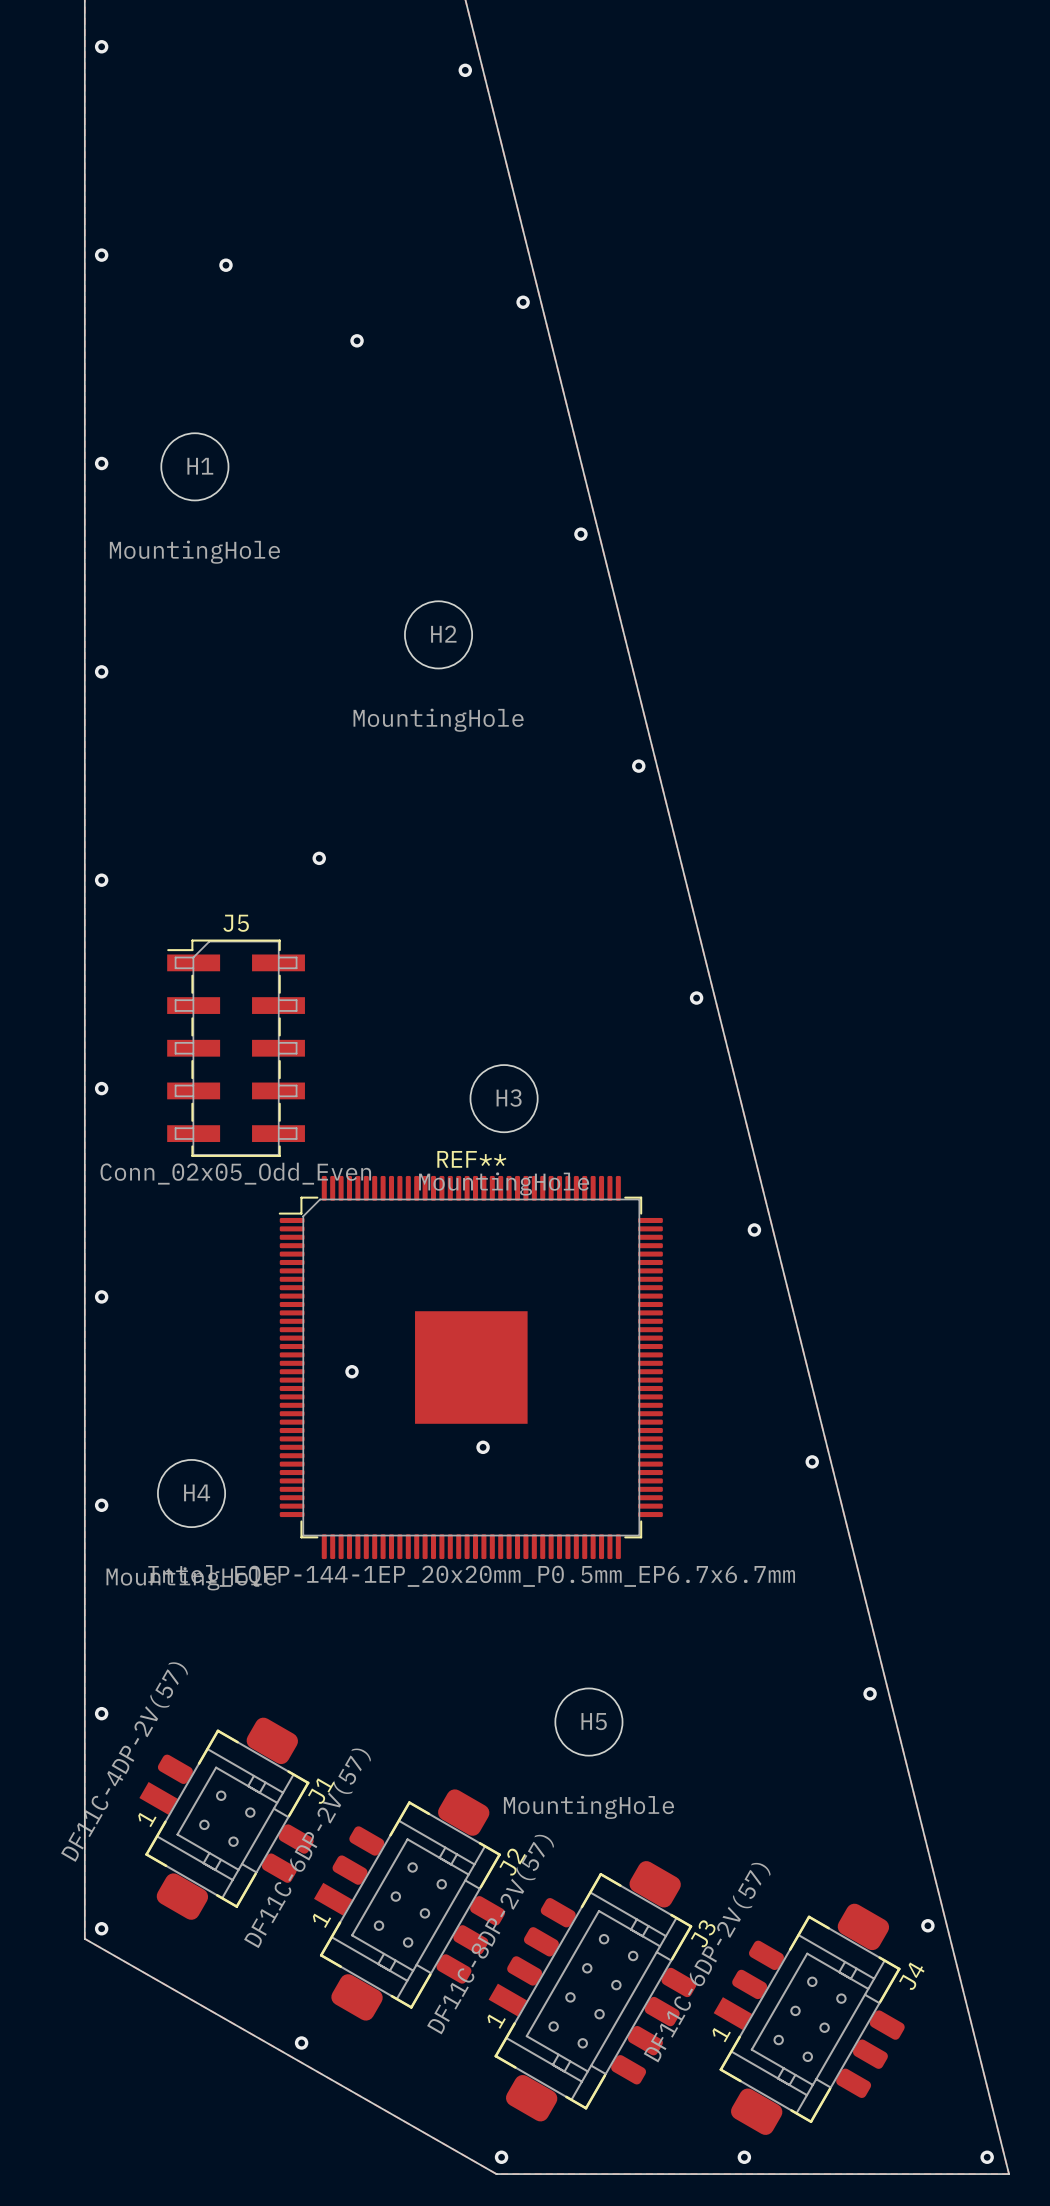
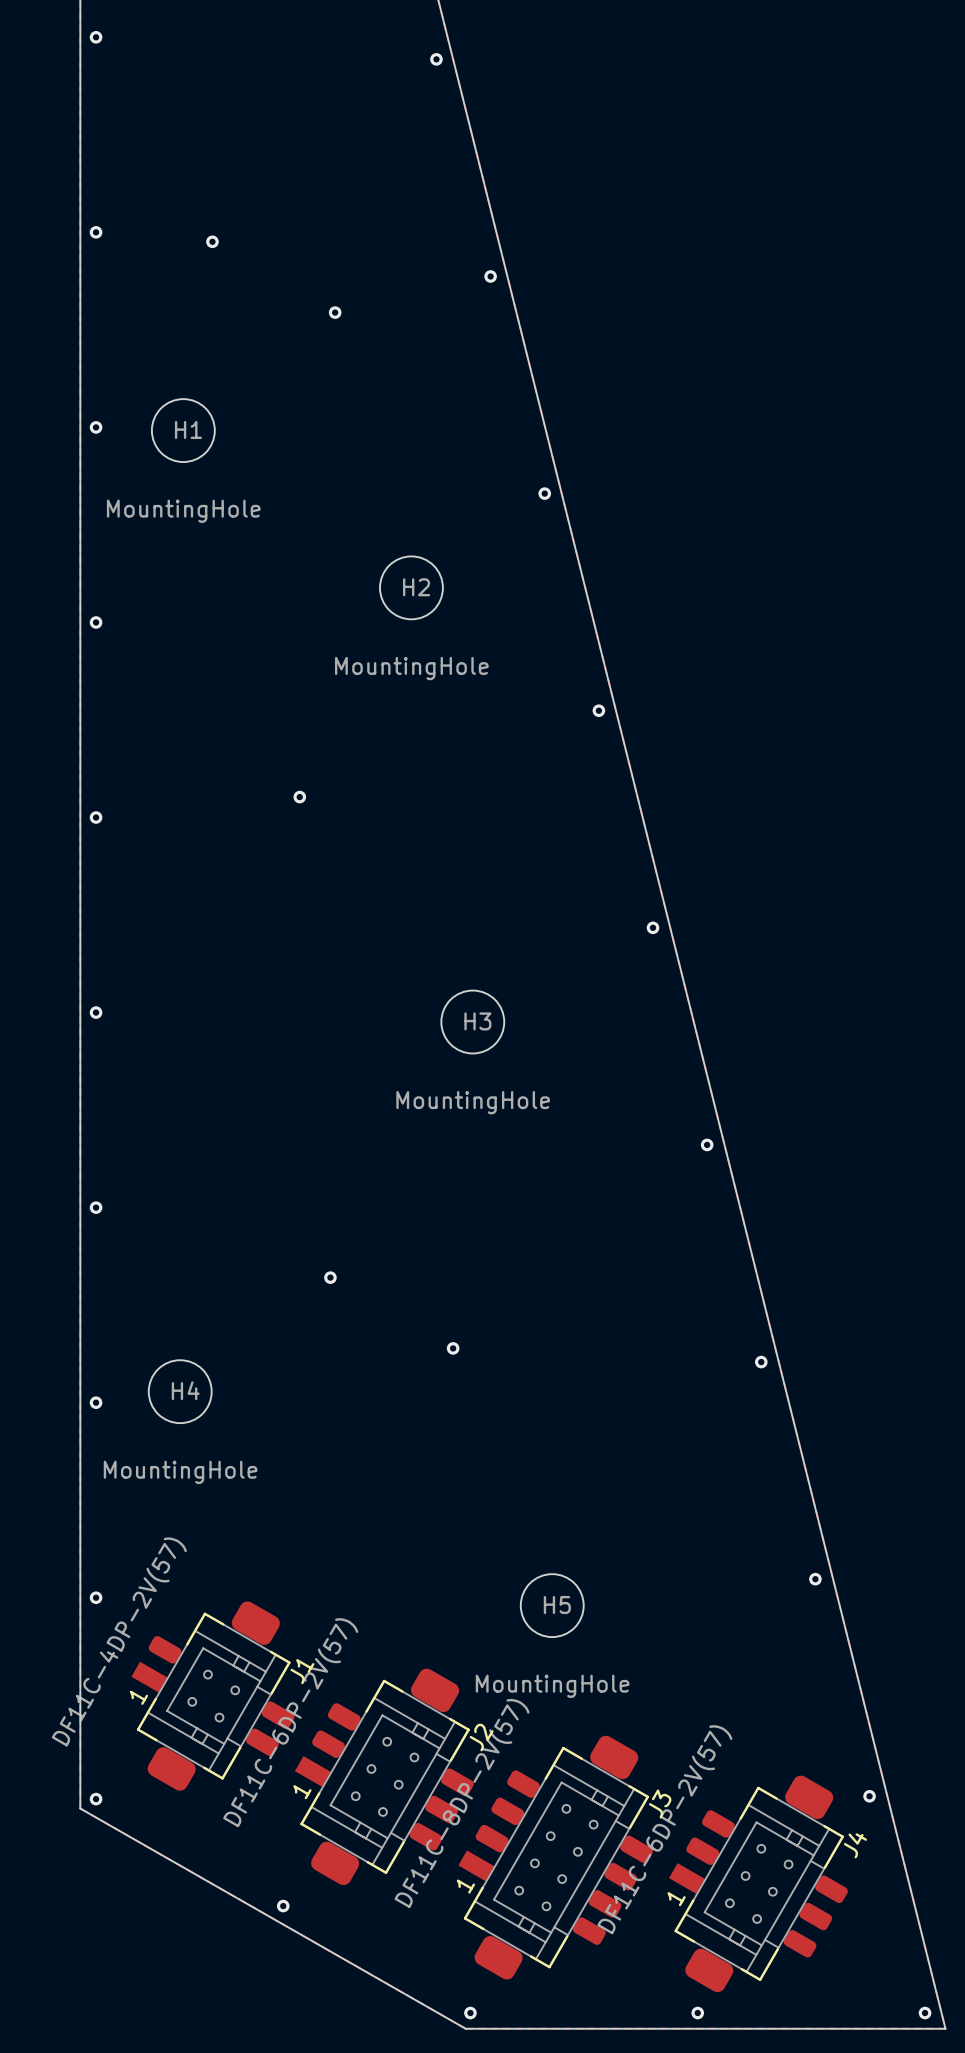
J5: Conn_02x05_Odd_Even (236, 1048) -> none
REF**: Intel_EQFP-144-1EP_20x20mm_P0.5mm_EP6.7x6.7mm (470, 1367) -> none

